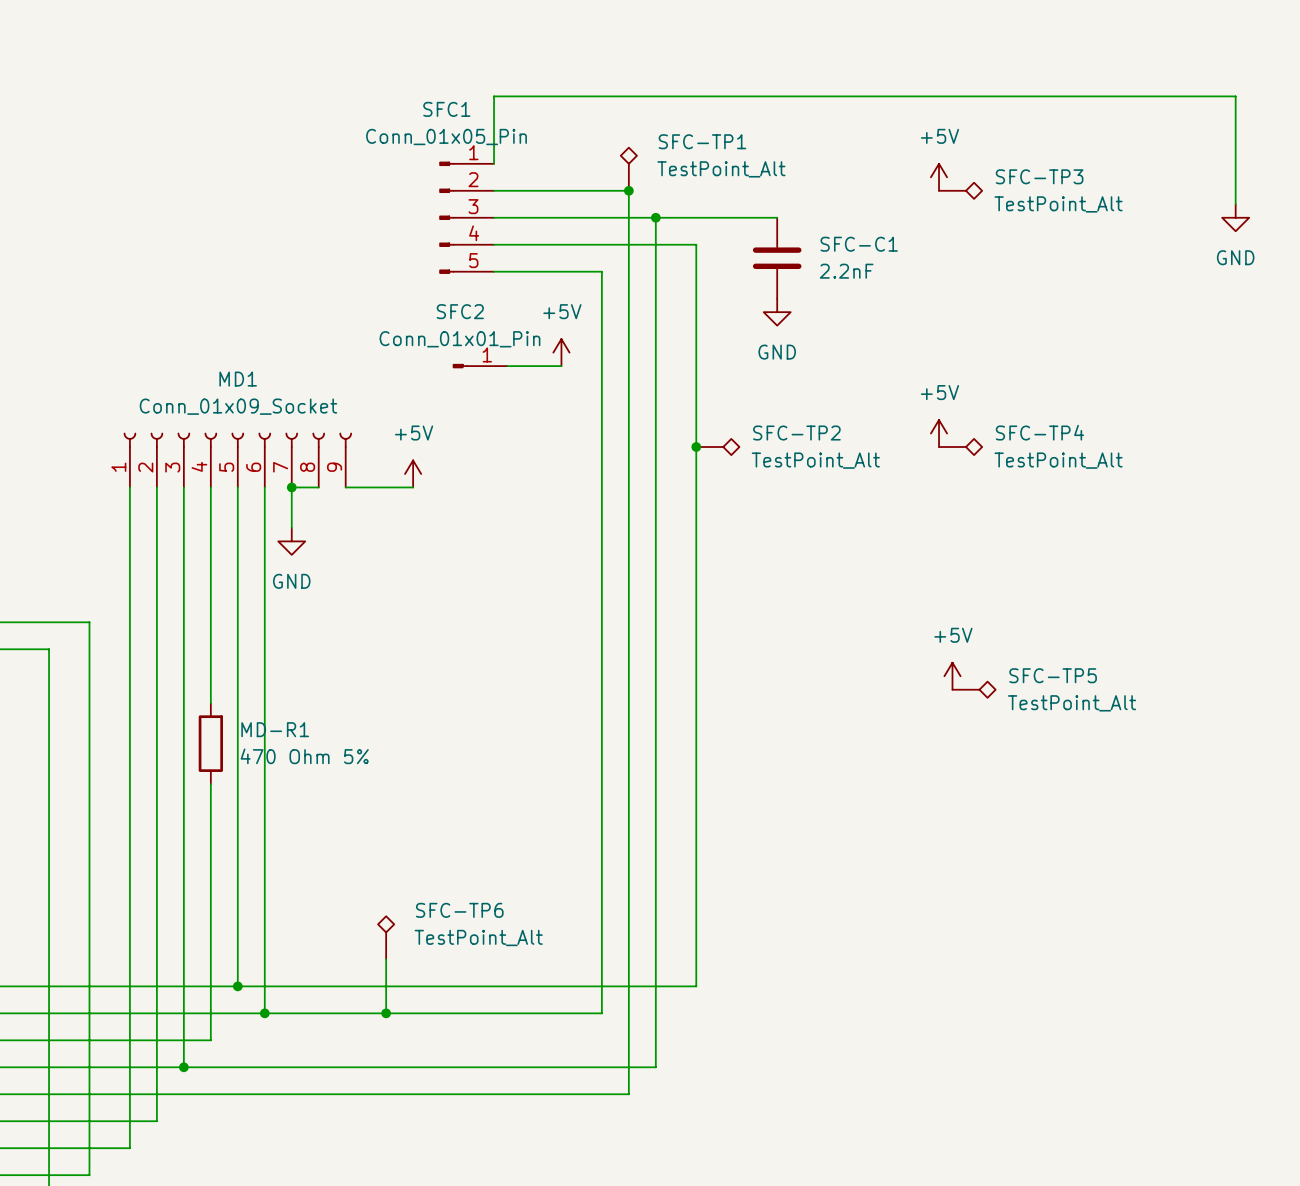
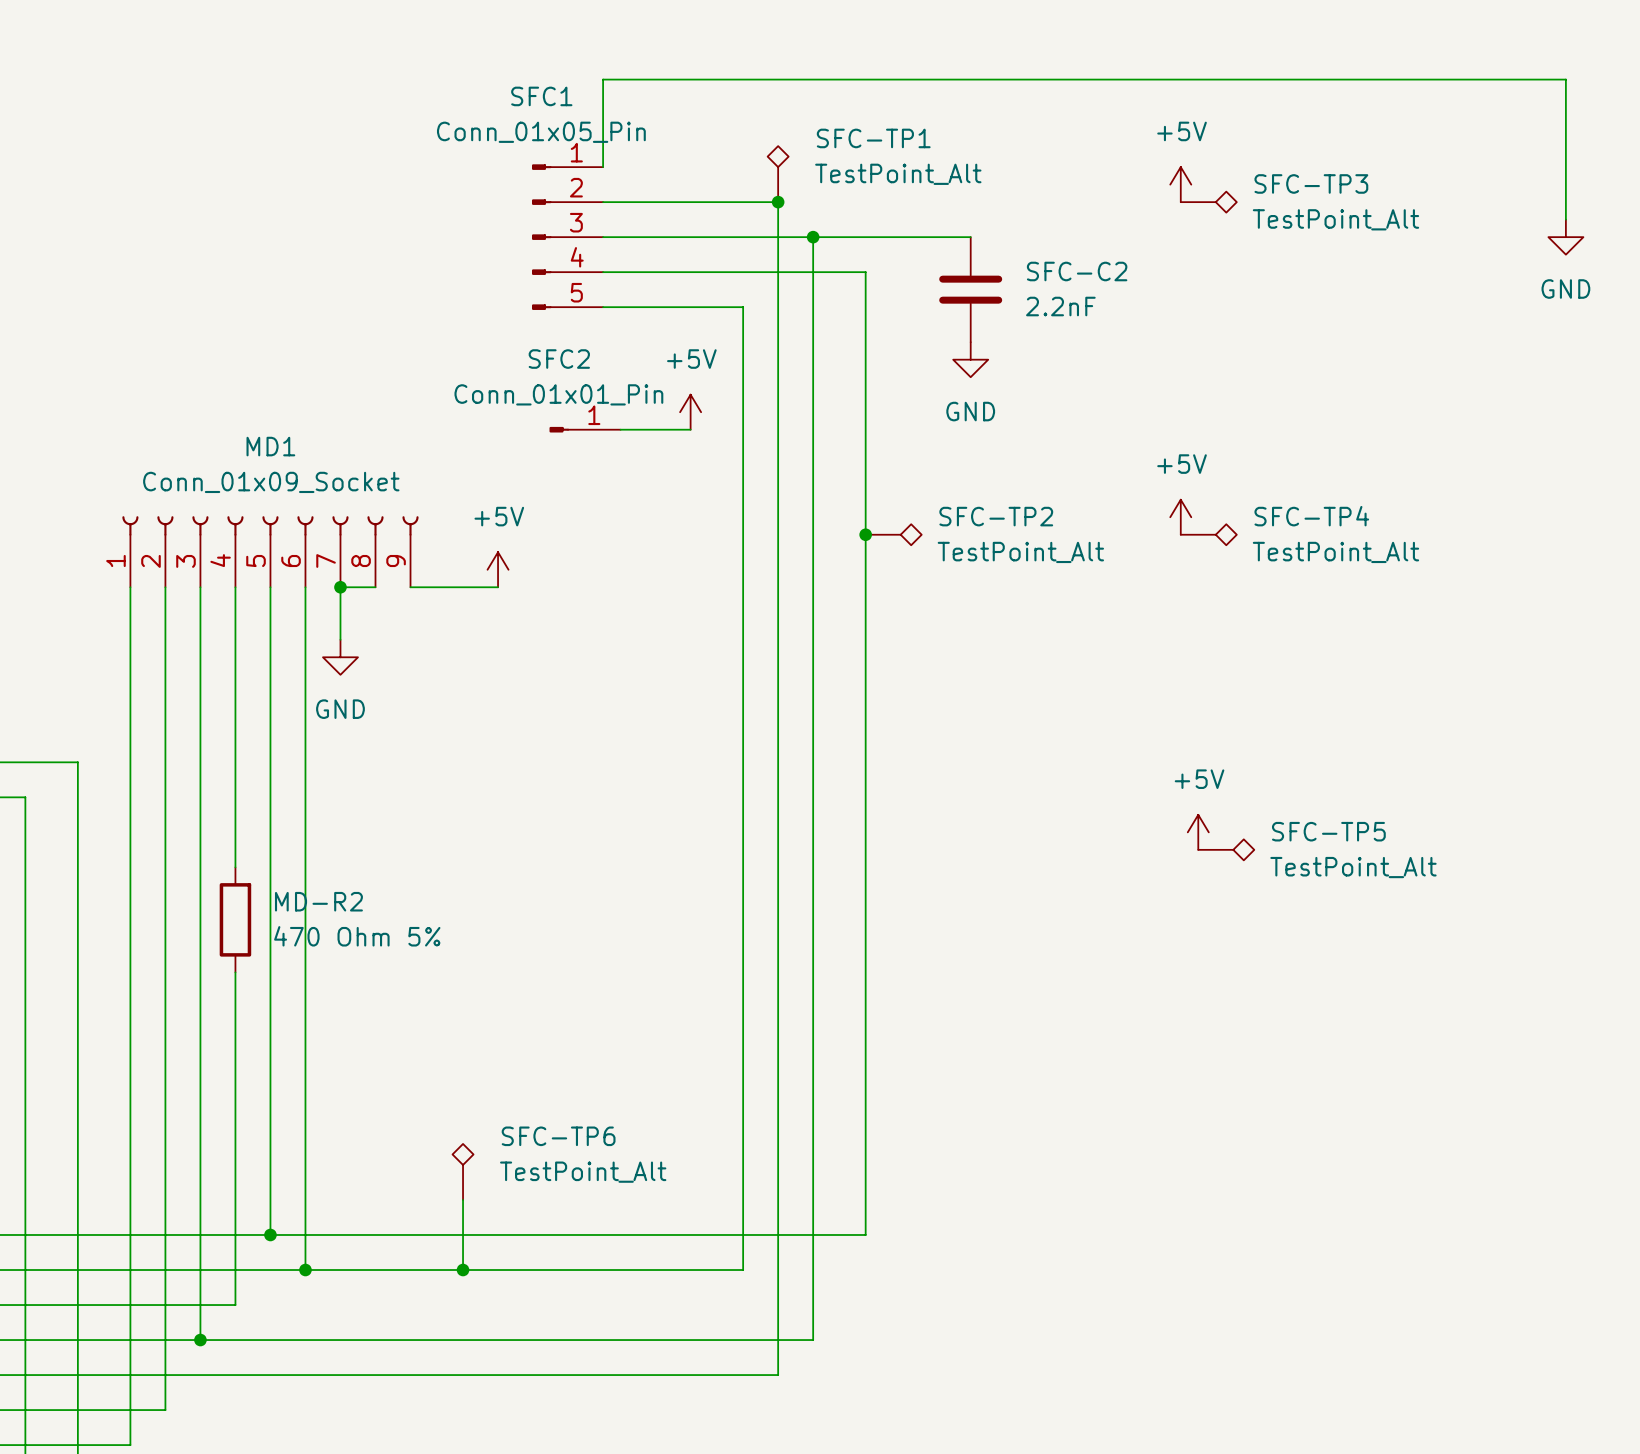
SFC-C1 name: SFC-C1 (859, 244) -> SFC-C2 (1077, 271)
MD-R1 name: MD-R1 (275, 729) -> MD-R2 (318, 901)

